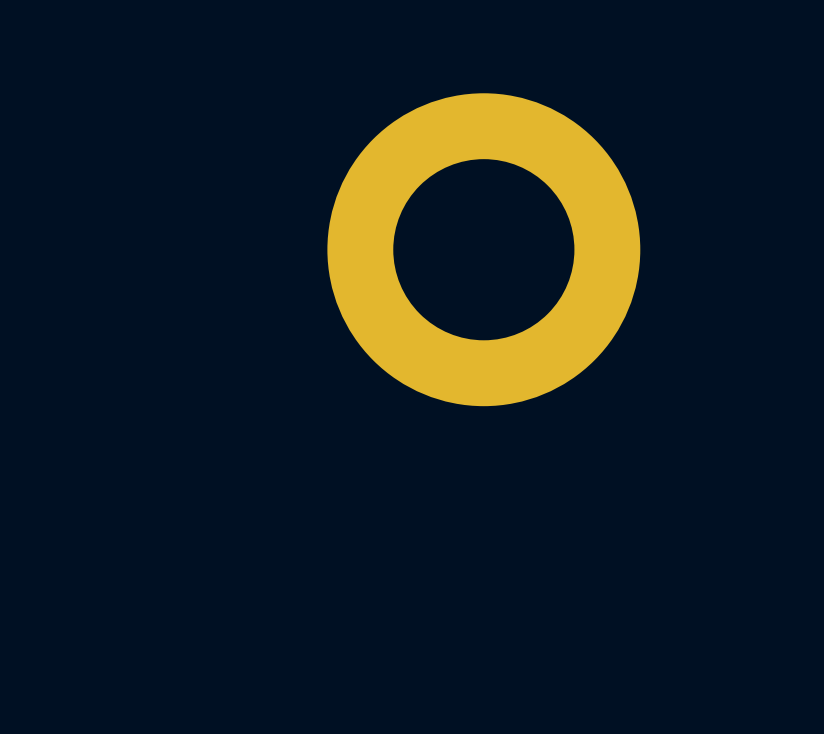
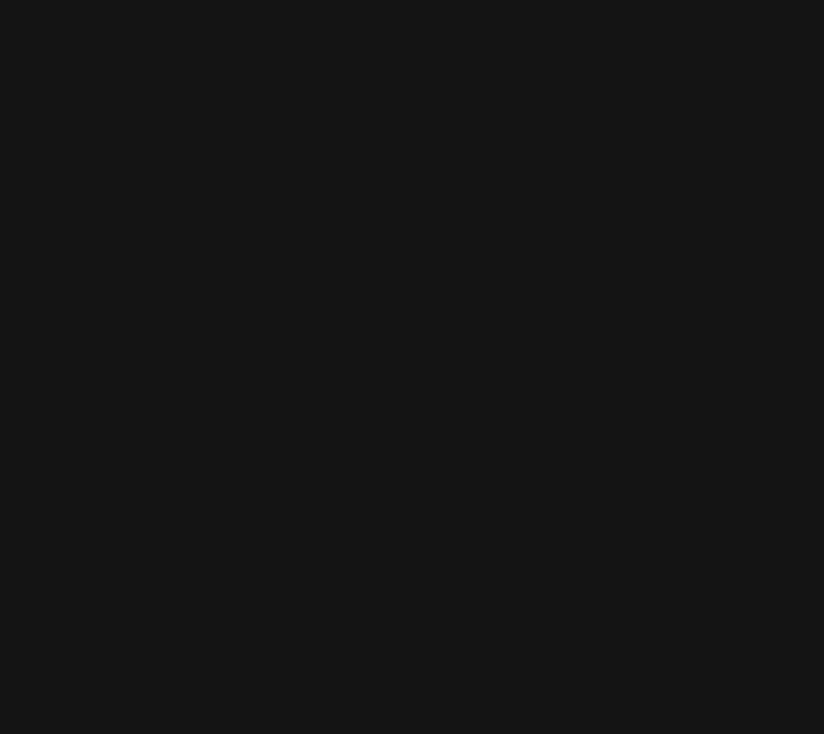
part: (483, 249) -> none

